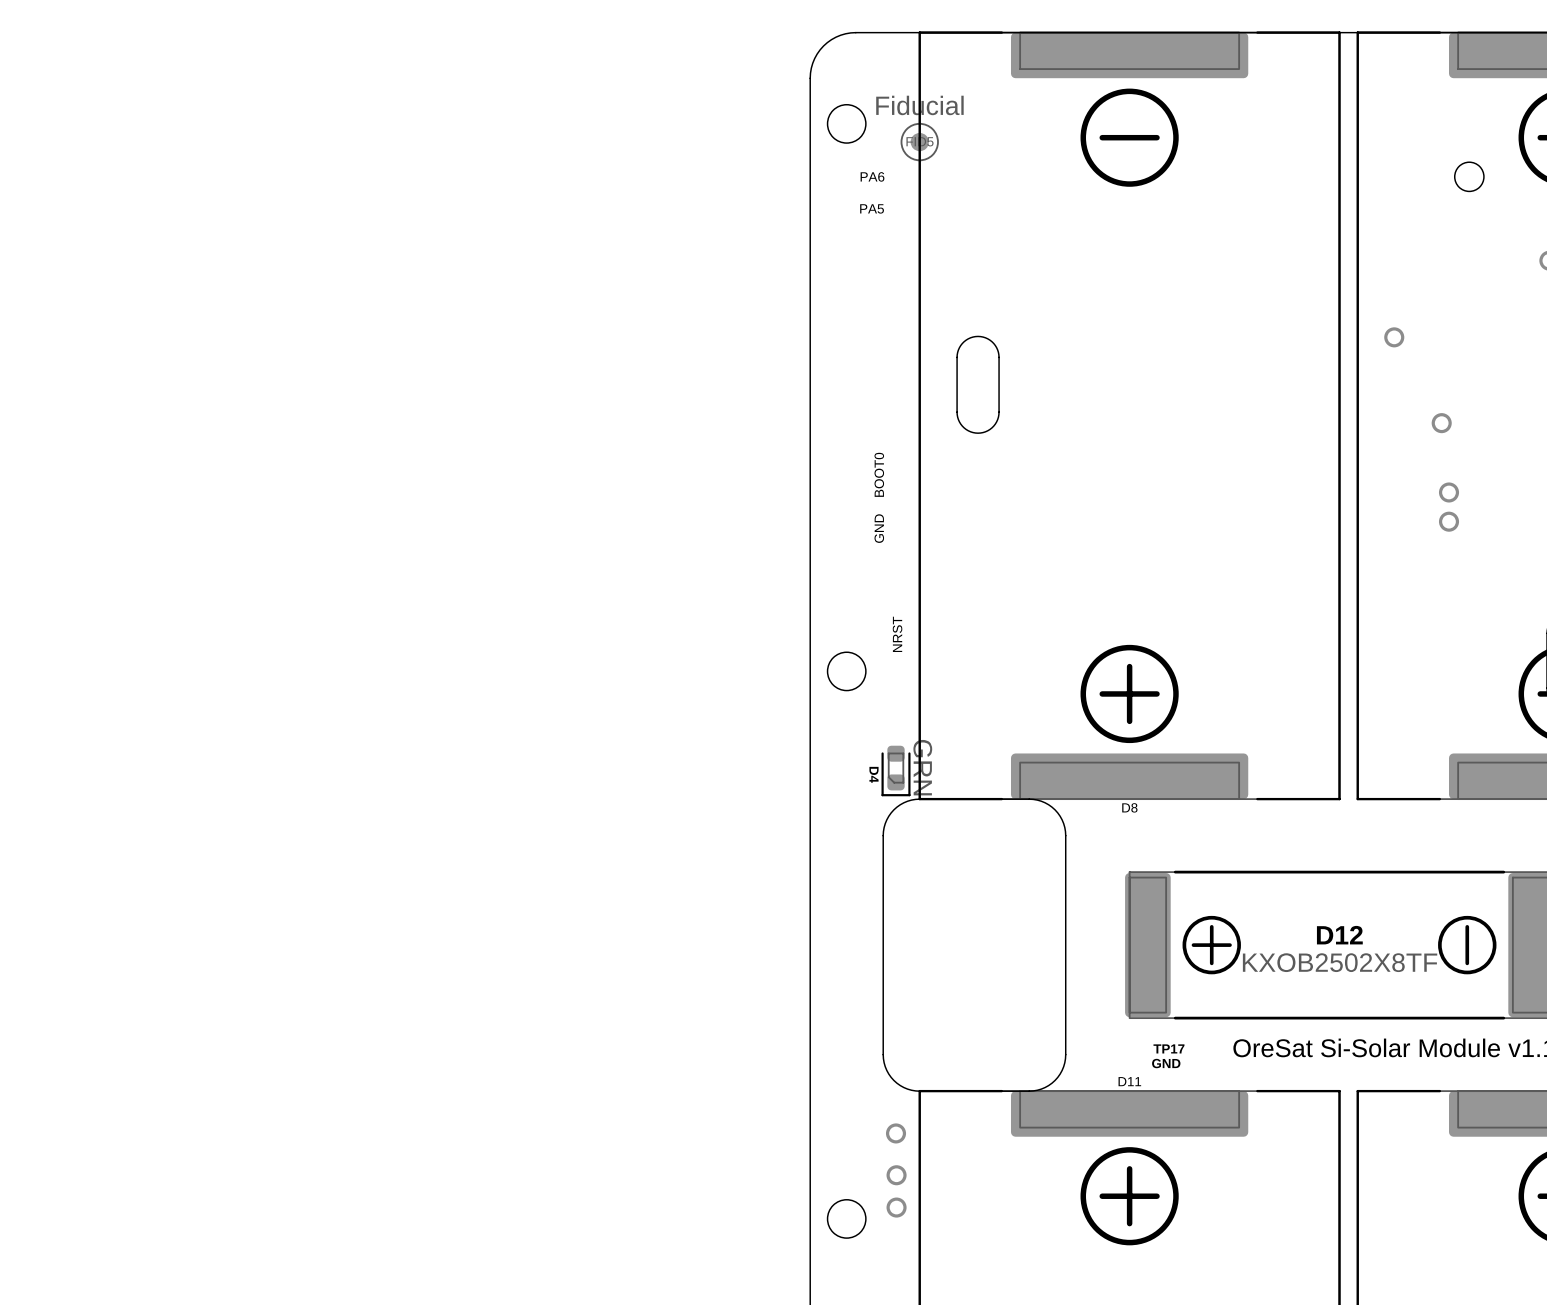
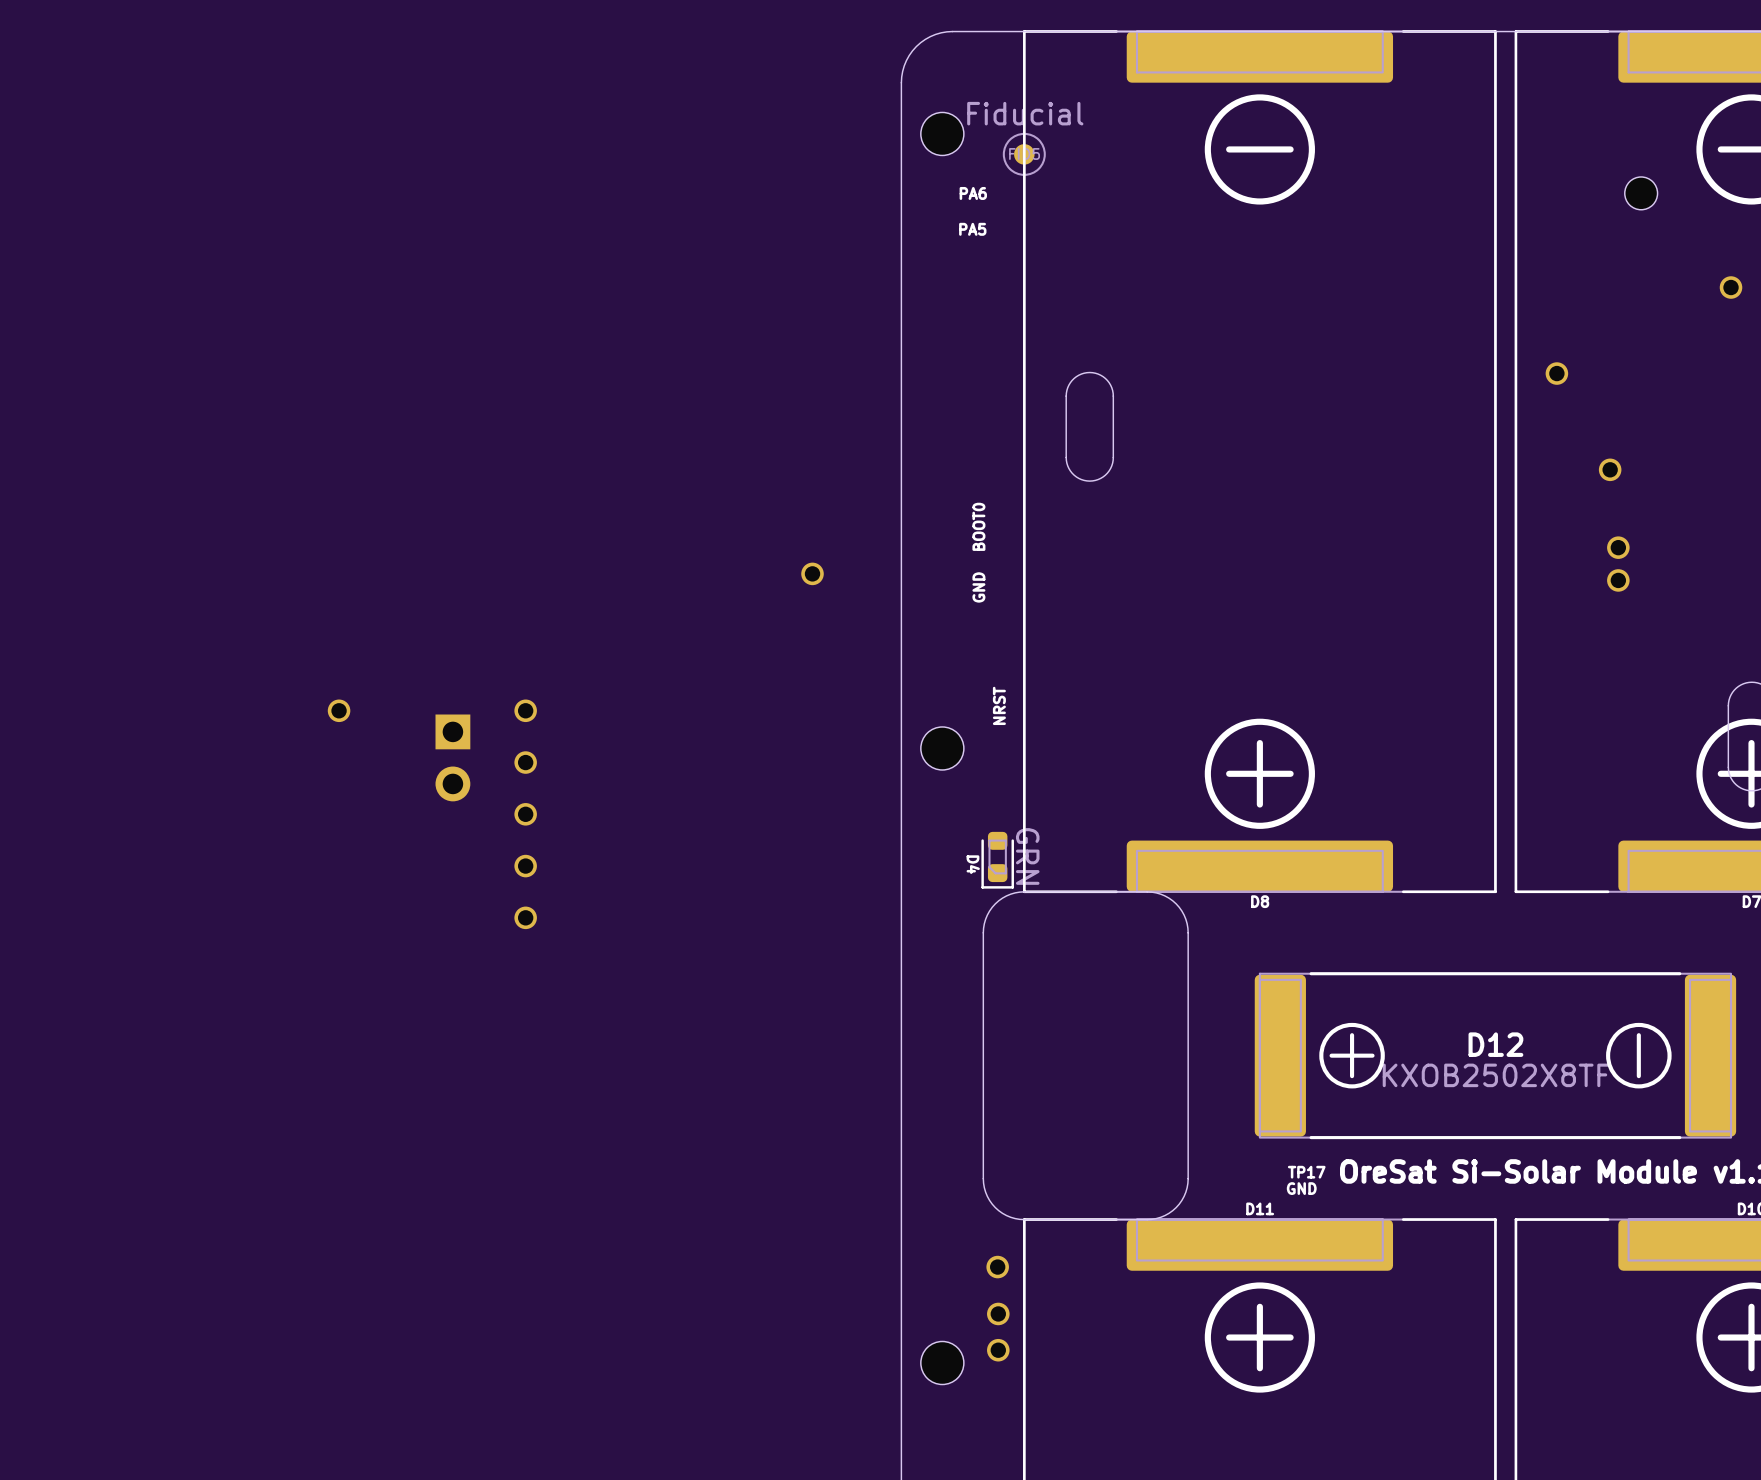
part: none -> (812, 573)
part: none -> (339, 710)
part: none -> (525, 710)
part: none -> (452, 757)
part: none -> (525, 762)
part: none -> (525, 814)
part: none -> (525, 866)
part: none -> (525, 917)

